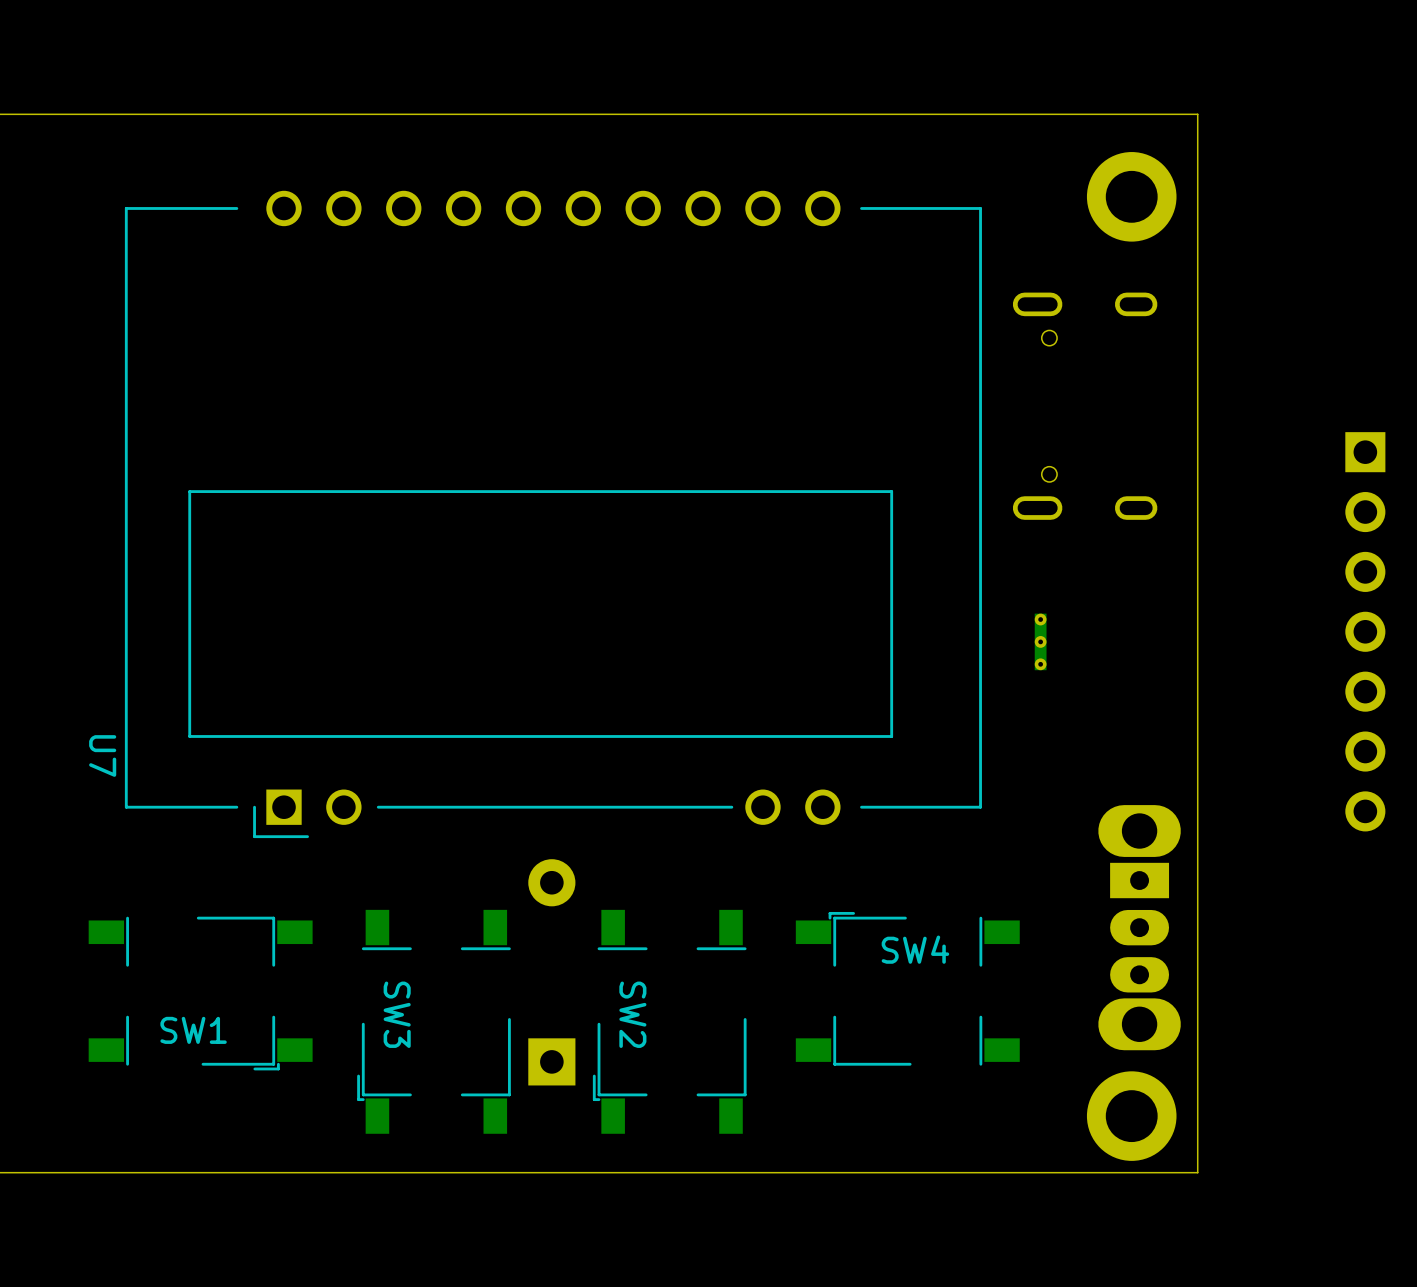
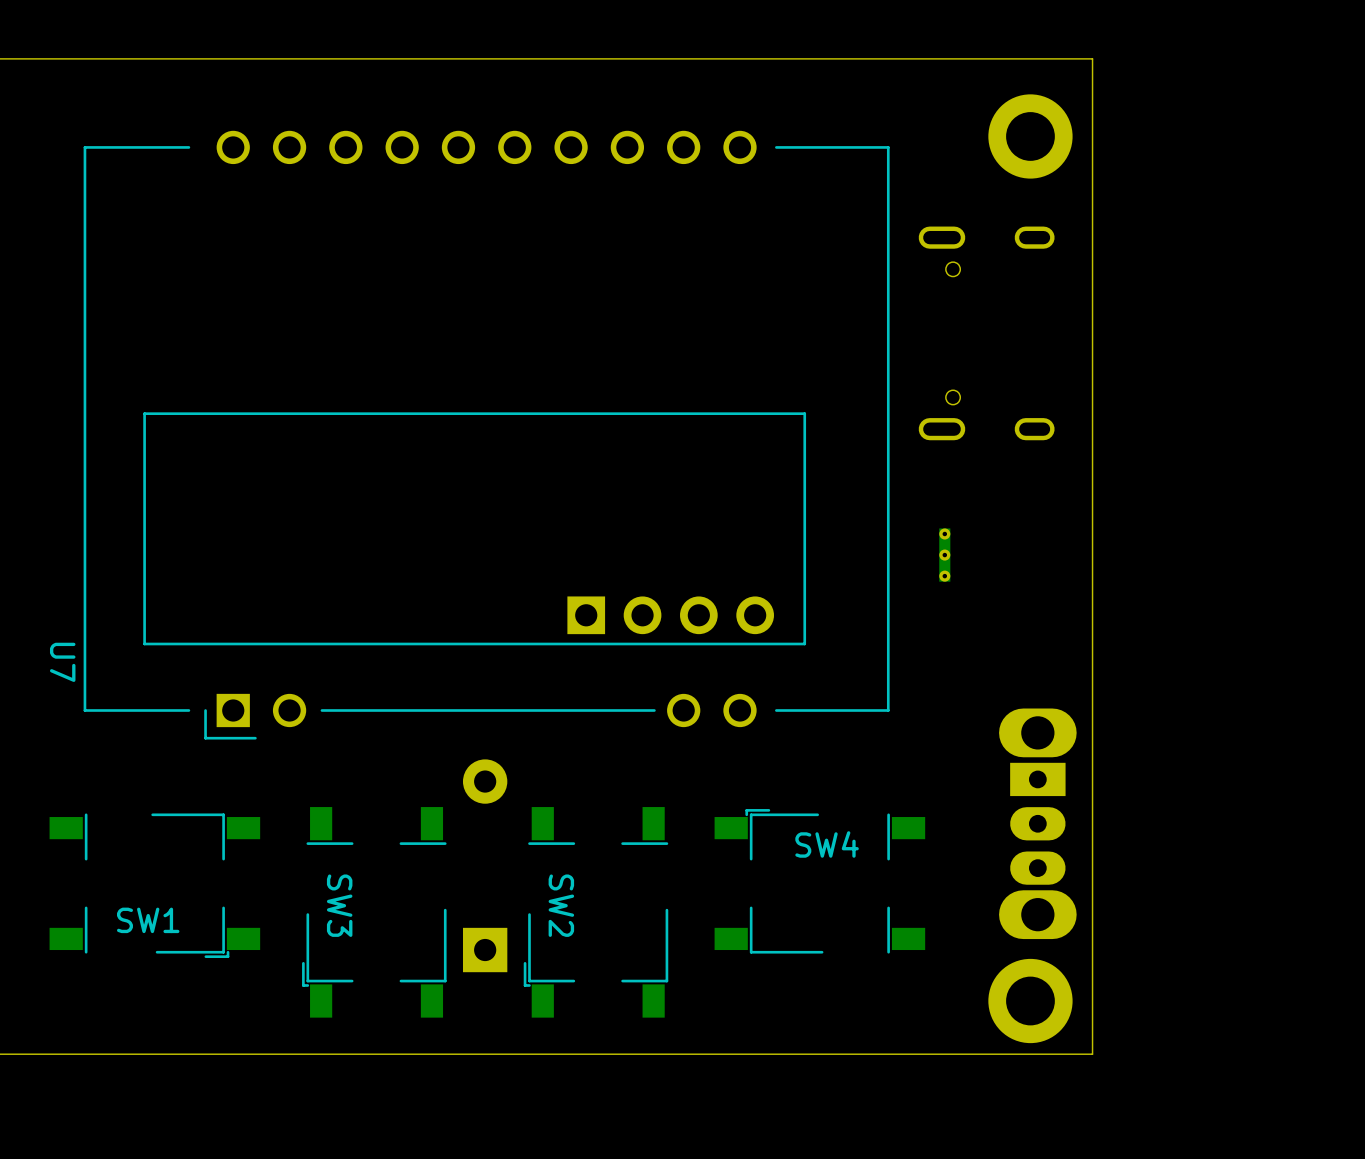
part: (1365, 631) -> none
part: none -> (670, 615)

